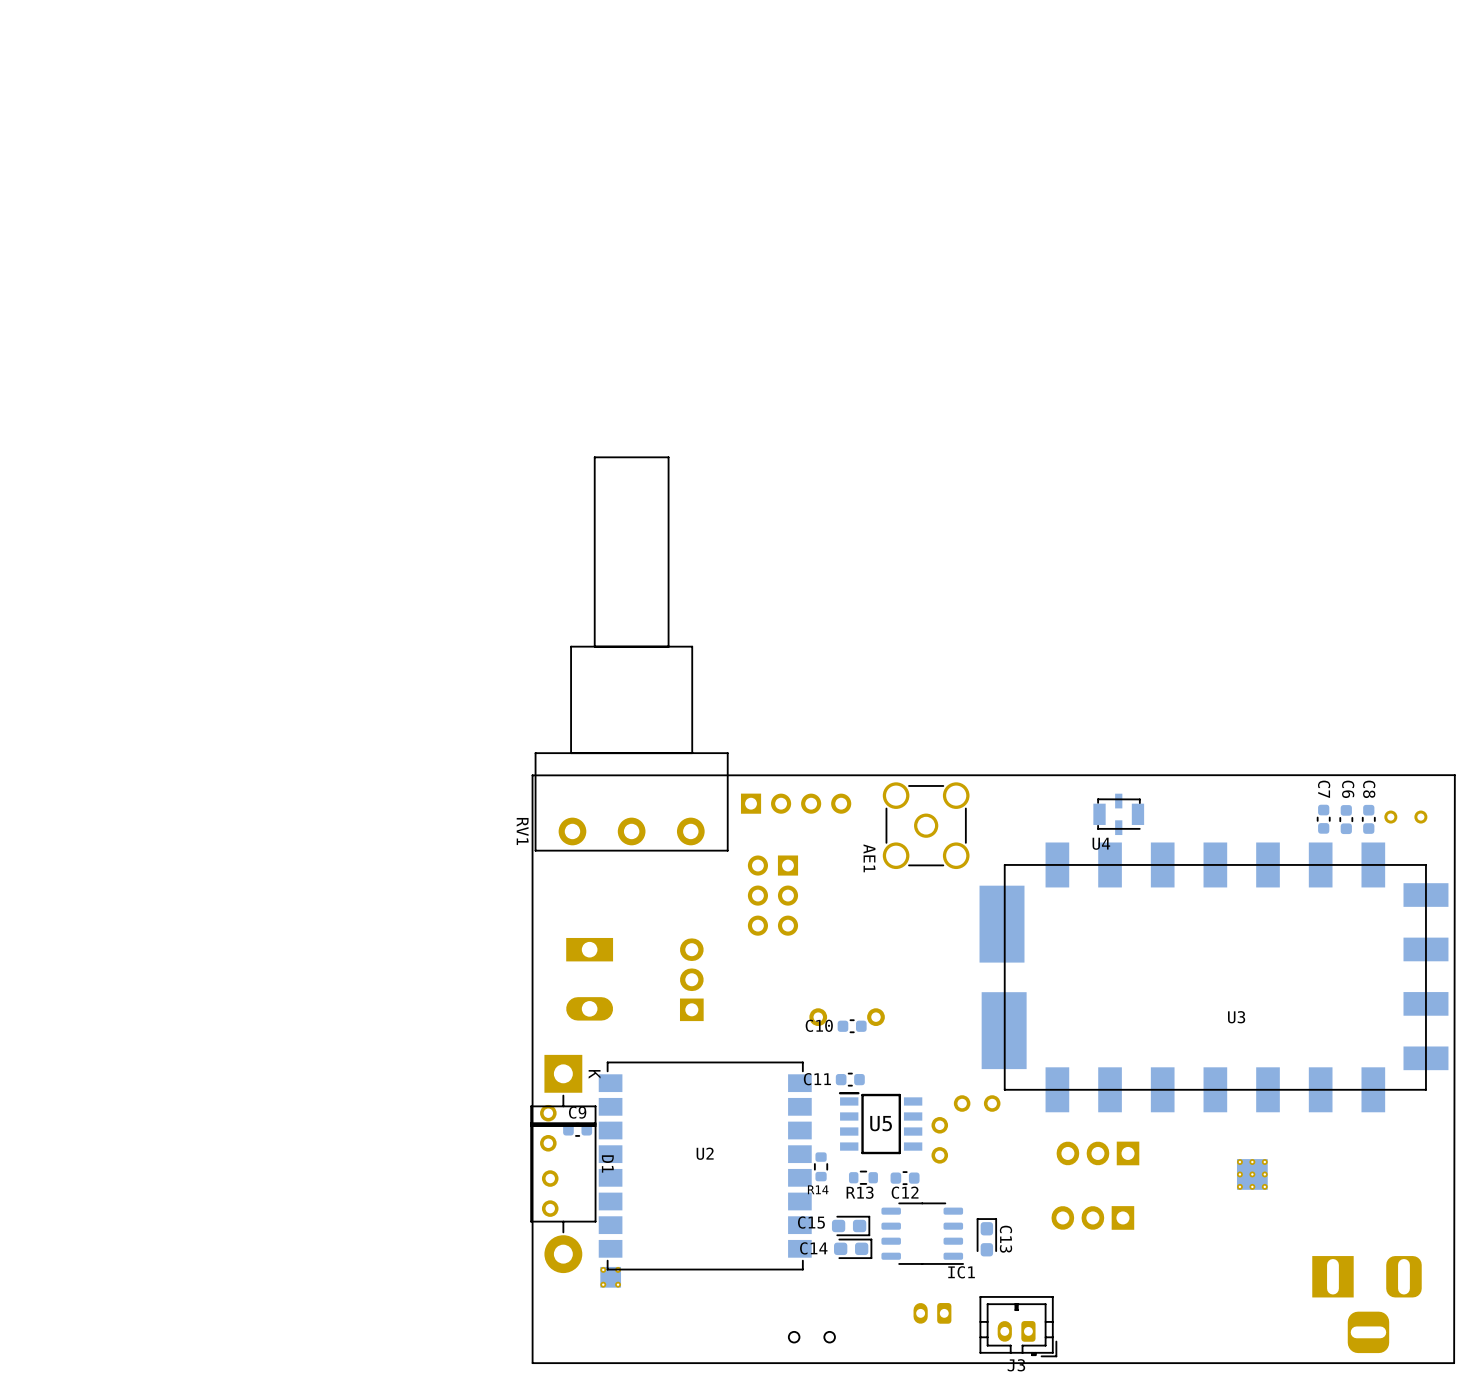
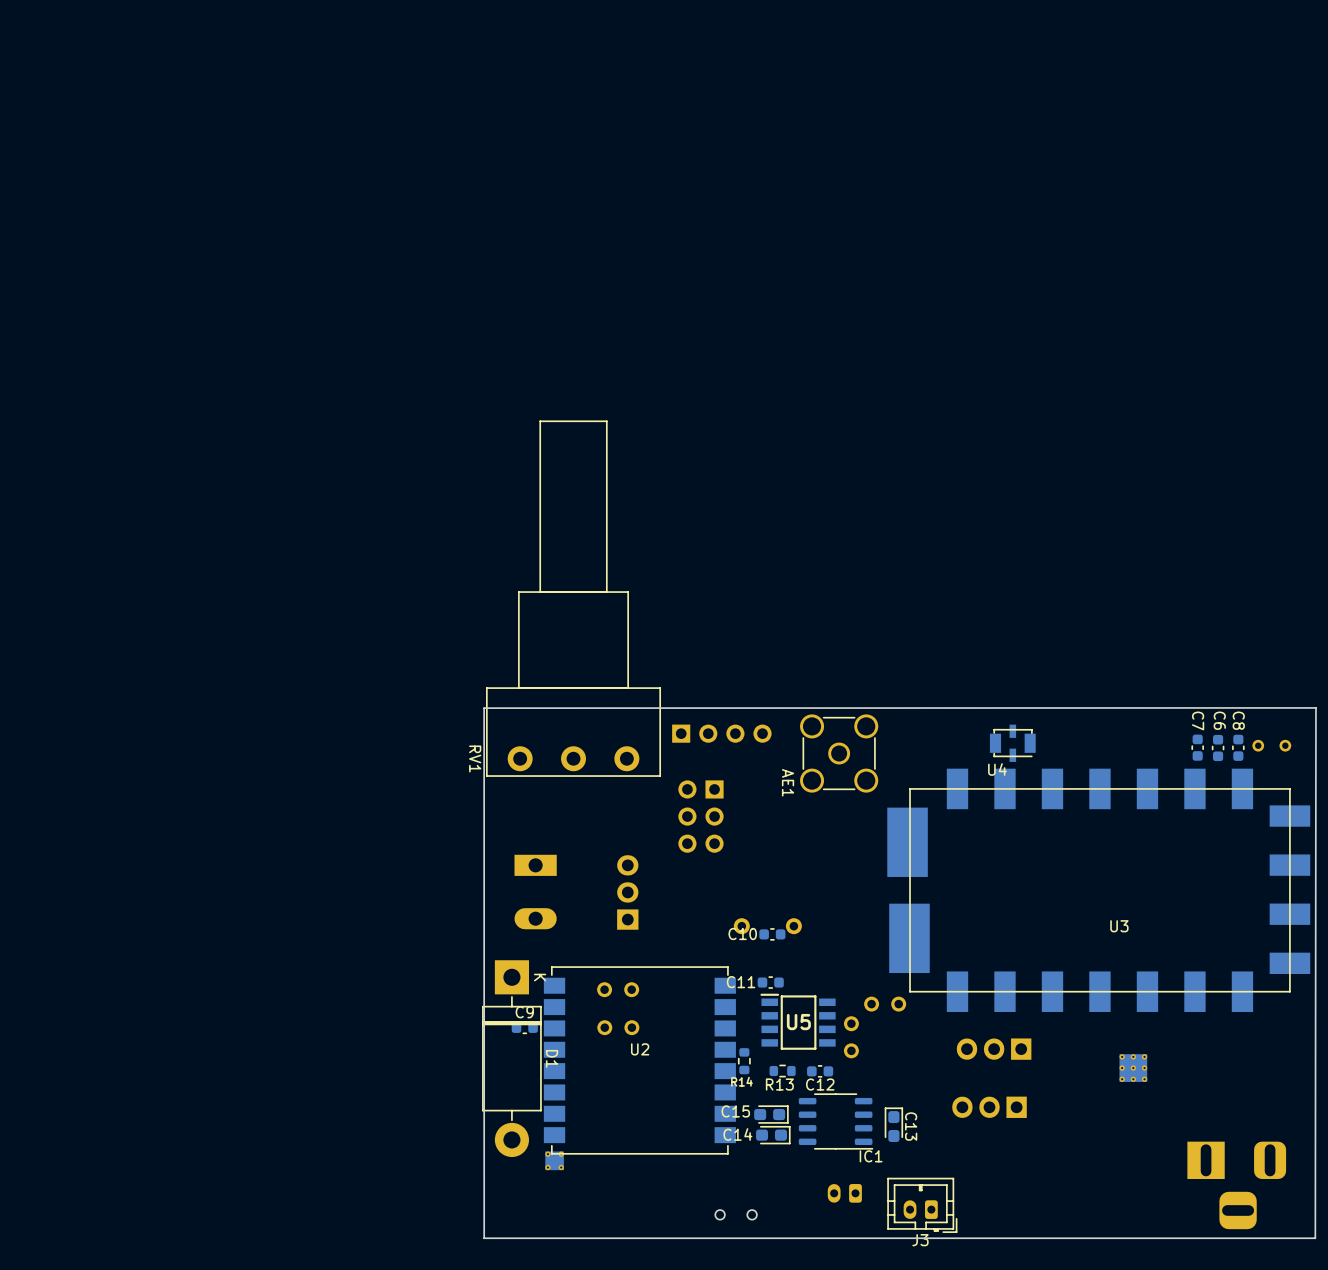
part: none -> (618, 989)
part: (548, 1128) -> none
part: none -> (618, 1027)
part: (550, 1193) -> none

